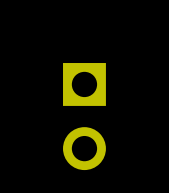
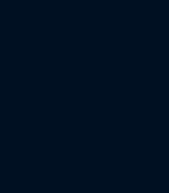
part: (84, 116) -> none

